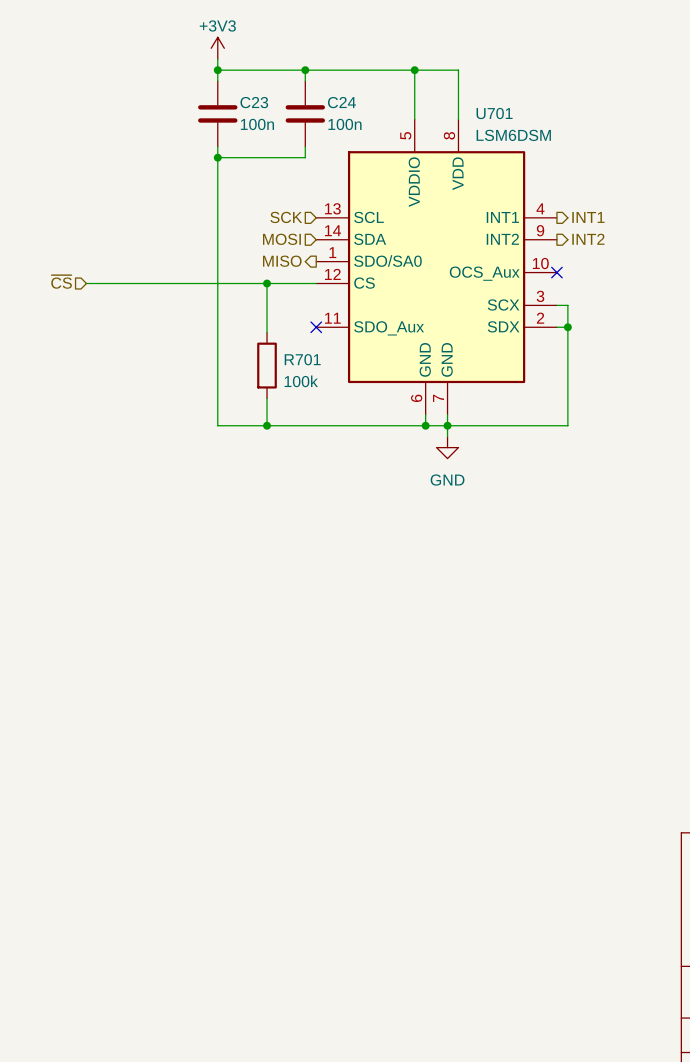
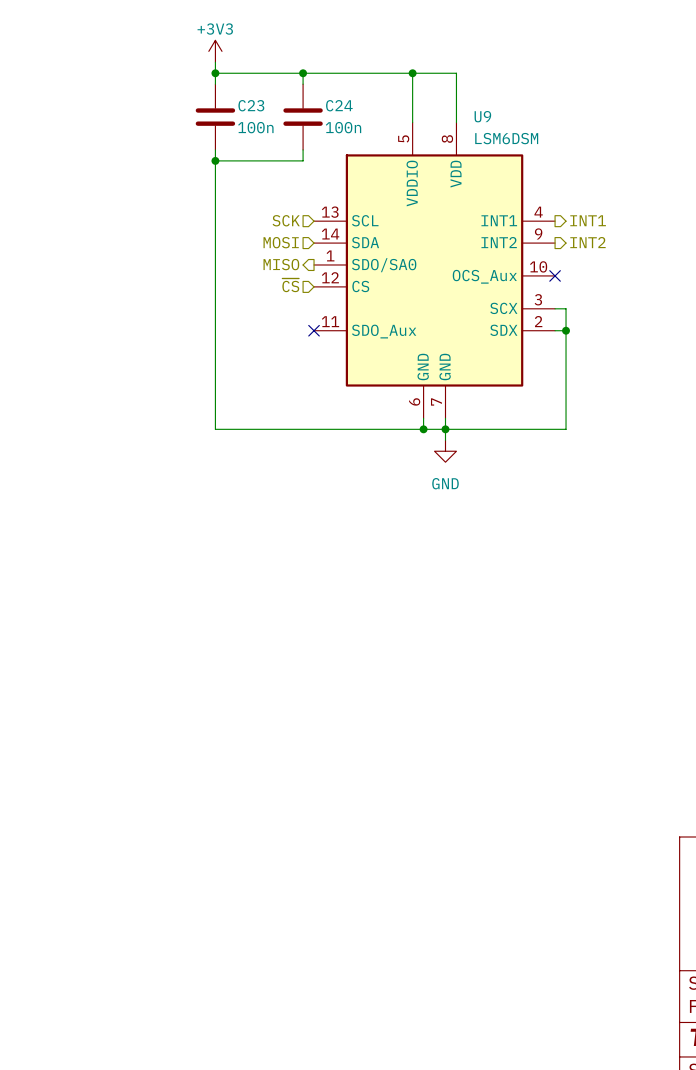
U701 name: U701 (494, 113) -> U9 (482, 116)
hierarchical label: ~{CS} (61, 281) -> none
hierarchical label: none -> ~{CS} (290, 285)
wire: (86, 283) (316, 283) -> none
wire: (267, 283) (267, 332) -> none
junction: (267, 283) -> none
R701: 100k (267, 365) -> none
wire: (267, 398) (267, 425) -> none
junction: (267, 425) -> none

